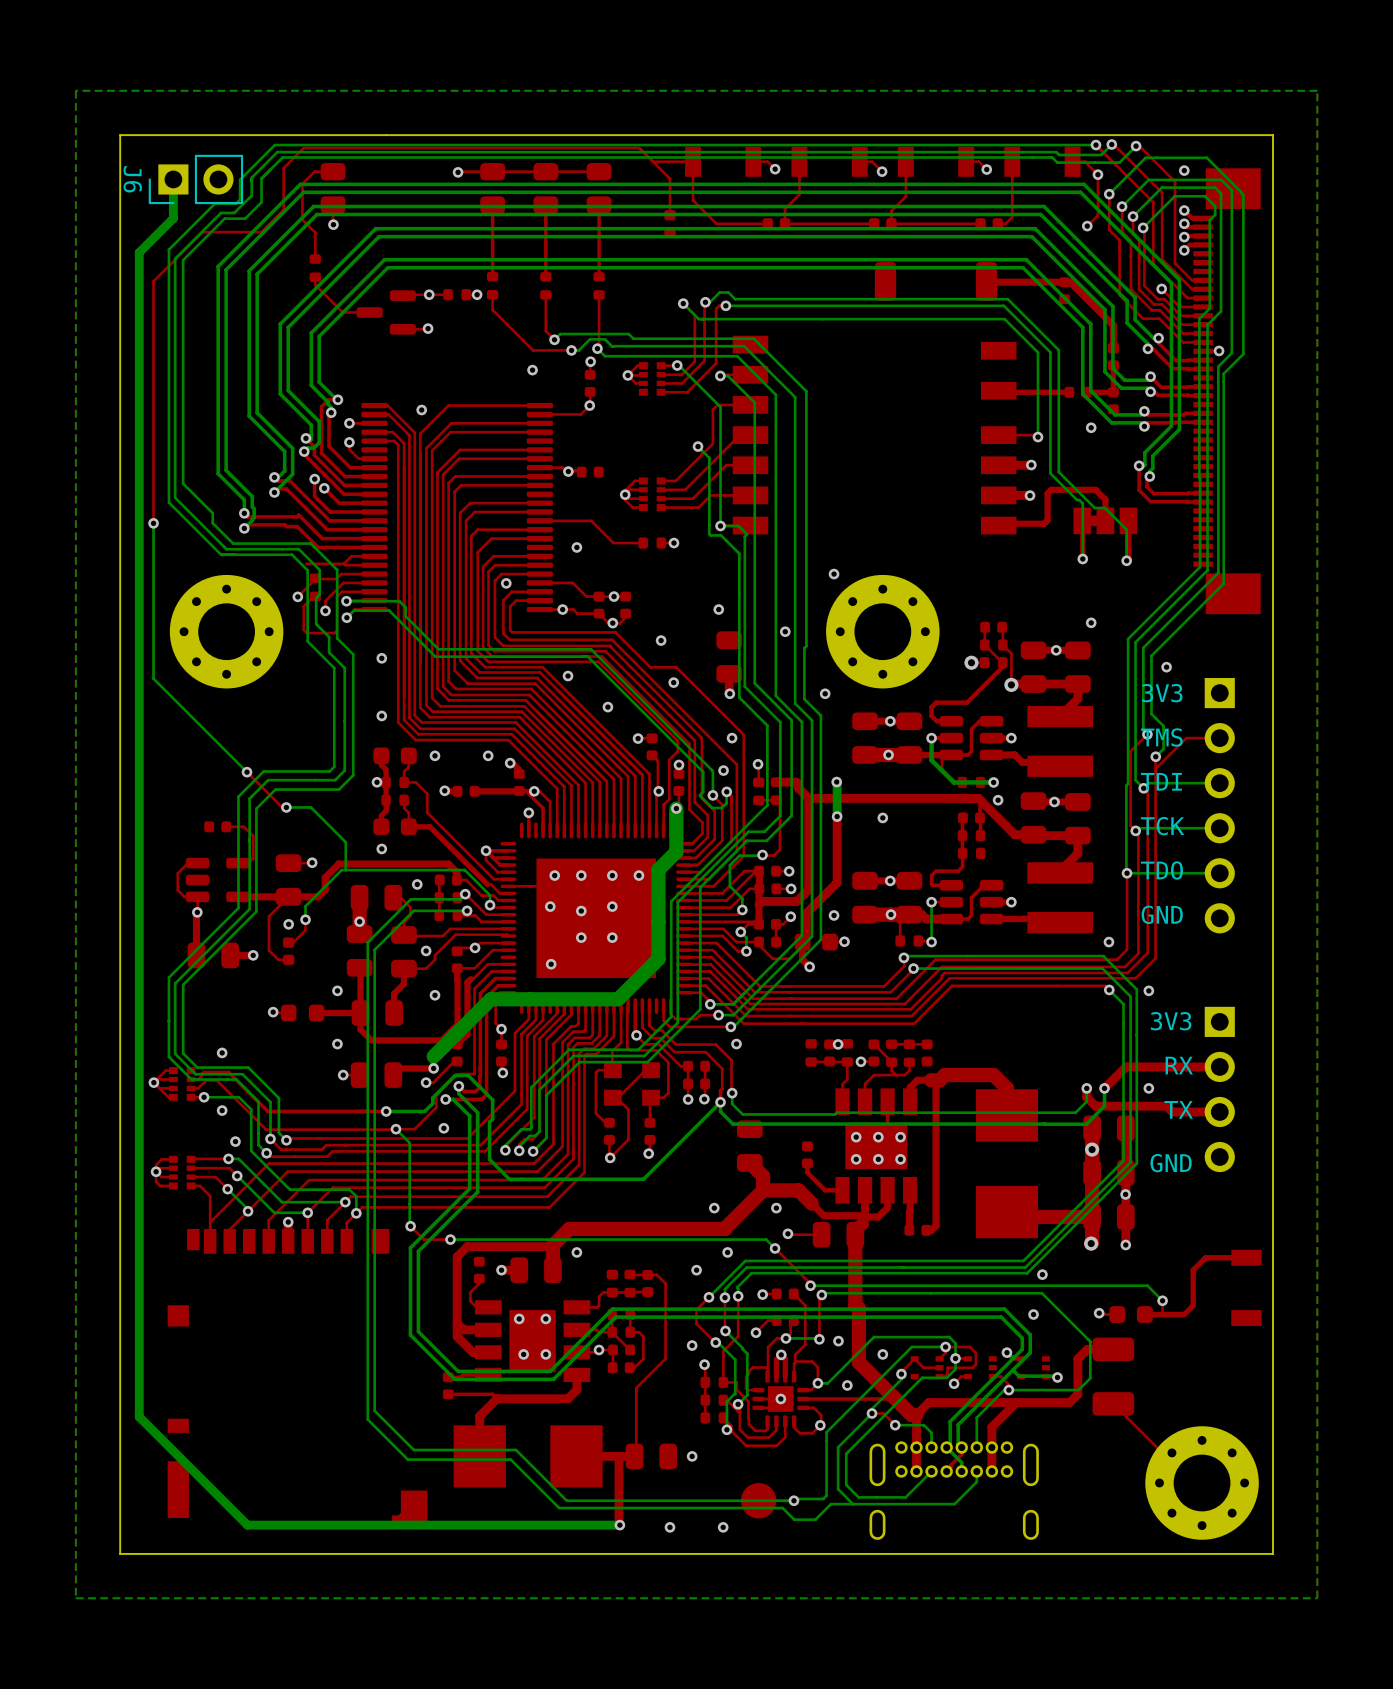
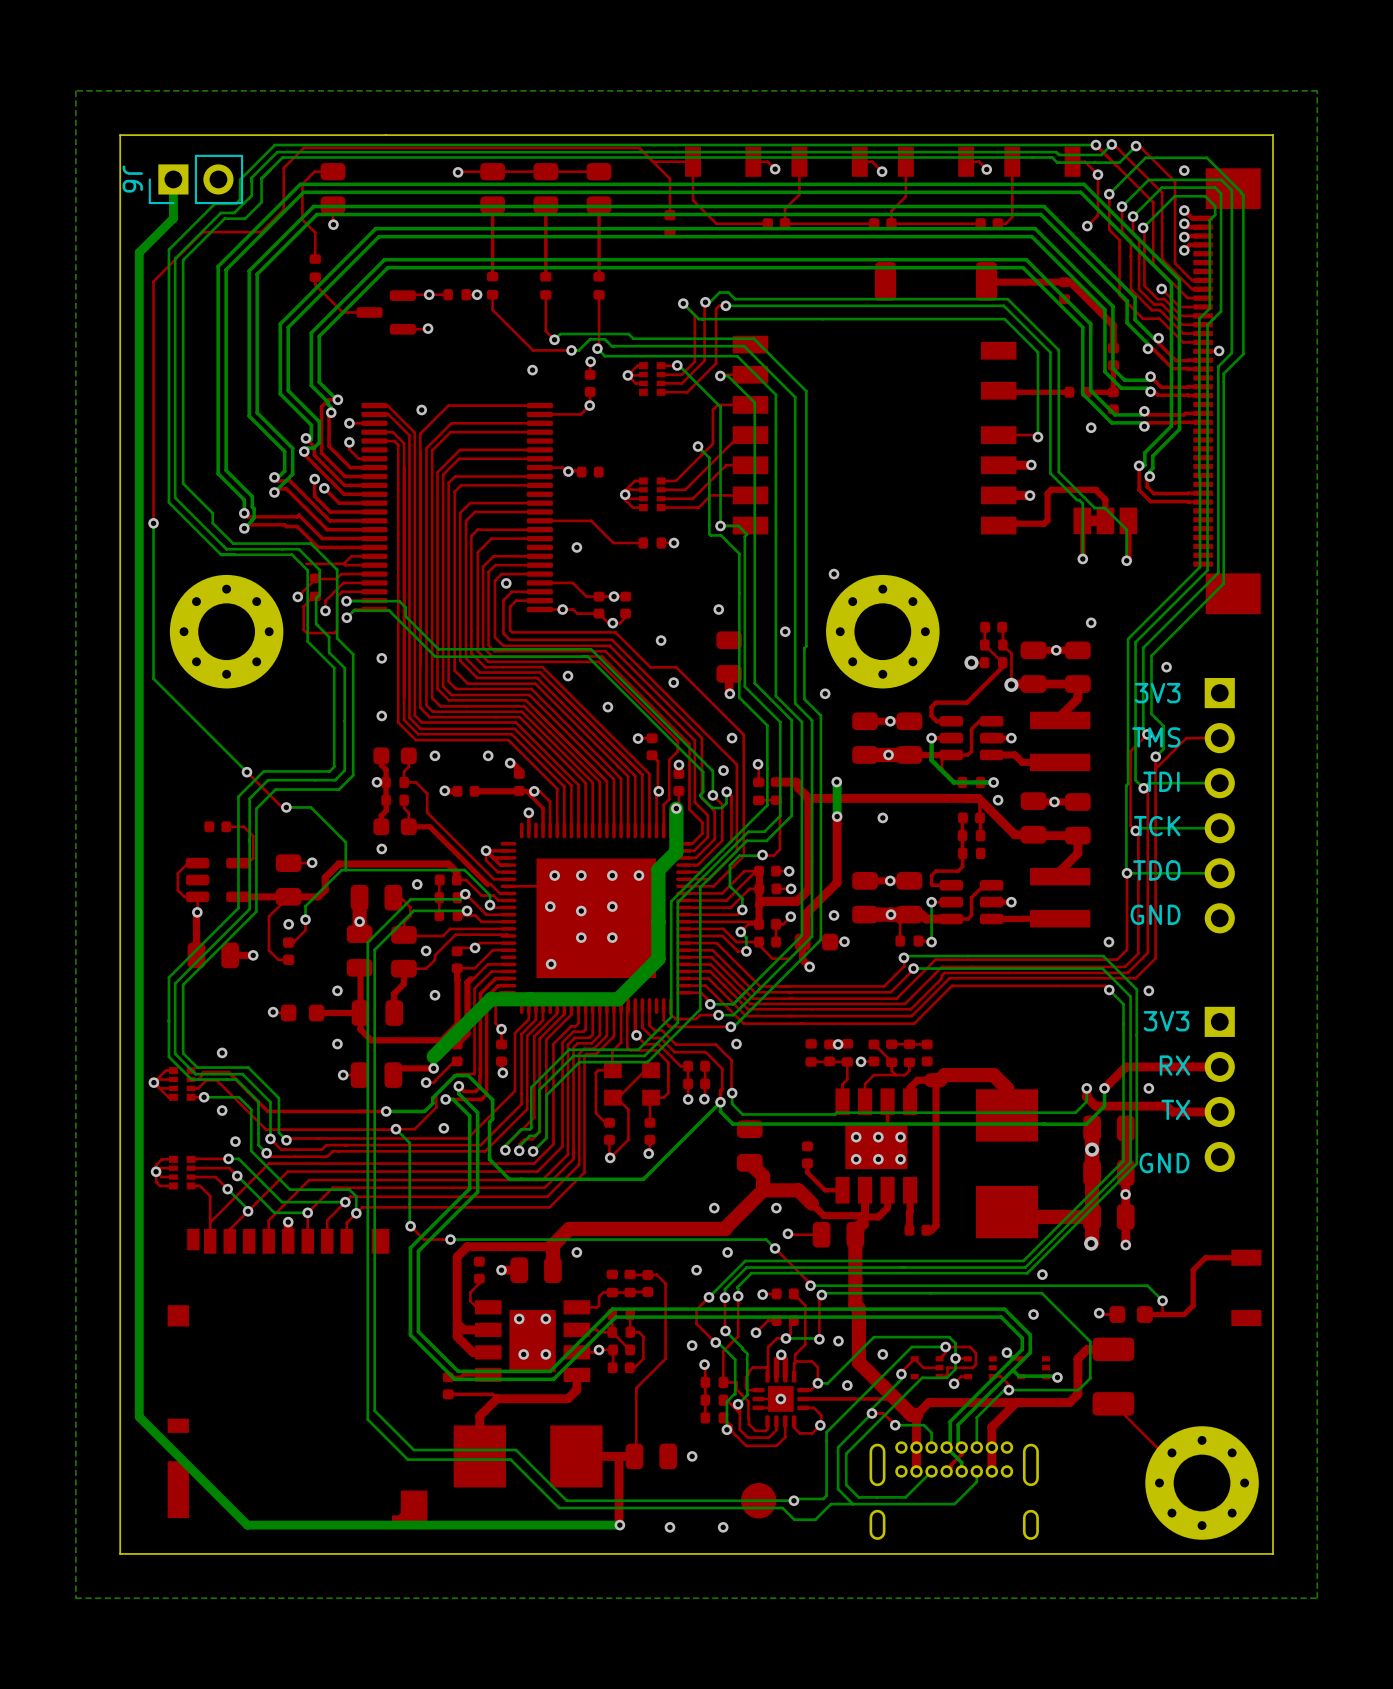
part footprint: [1027, 705, 1093, 777] -> [1030, 711, 1091, 772]
part footprint: [1027, 862, 1093, 934] -> [1030, 868, 1091, 928]

